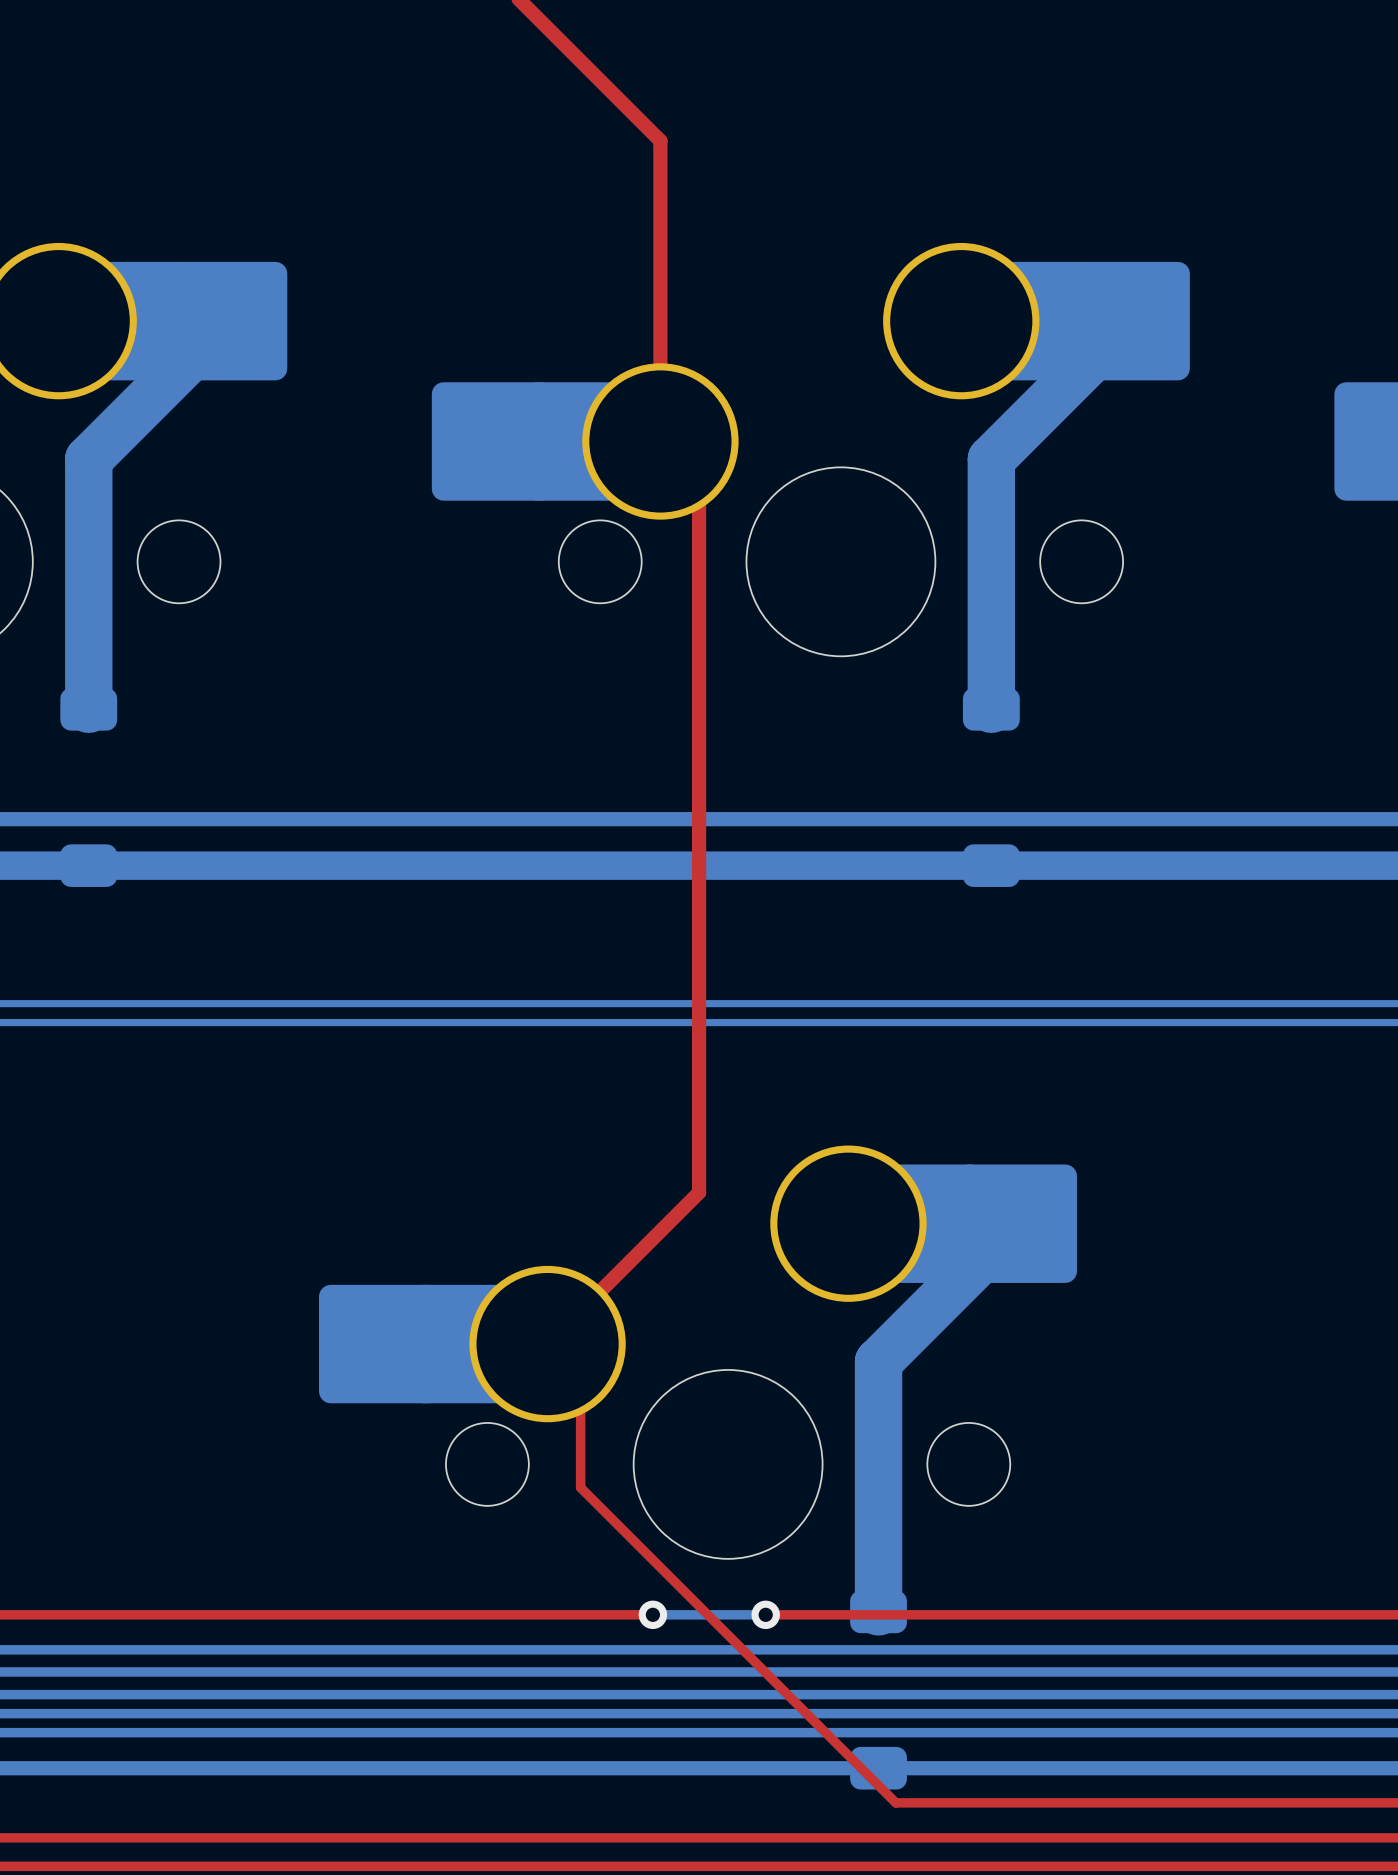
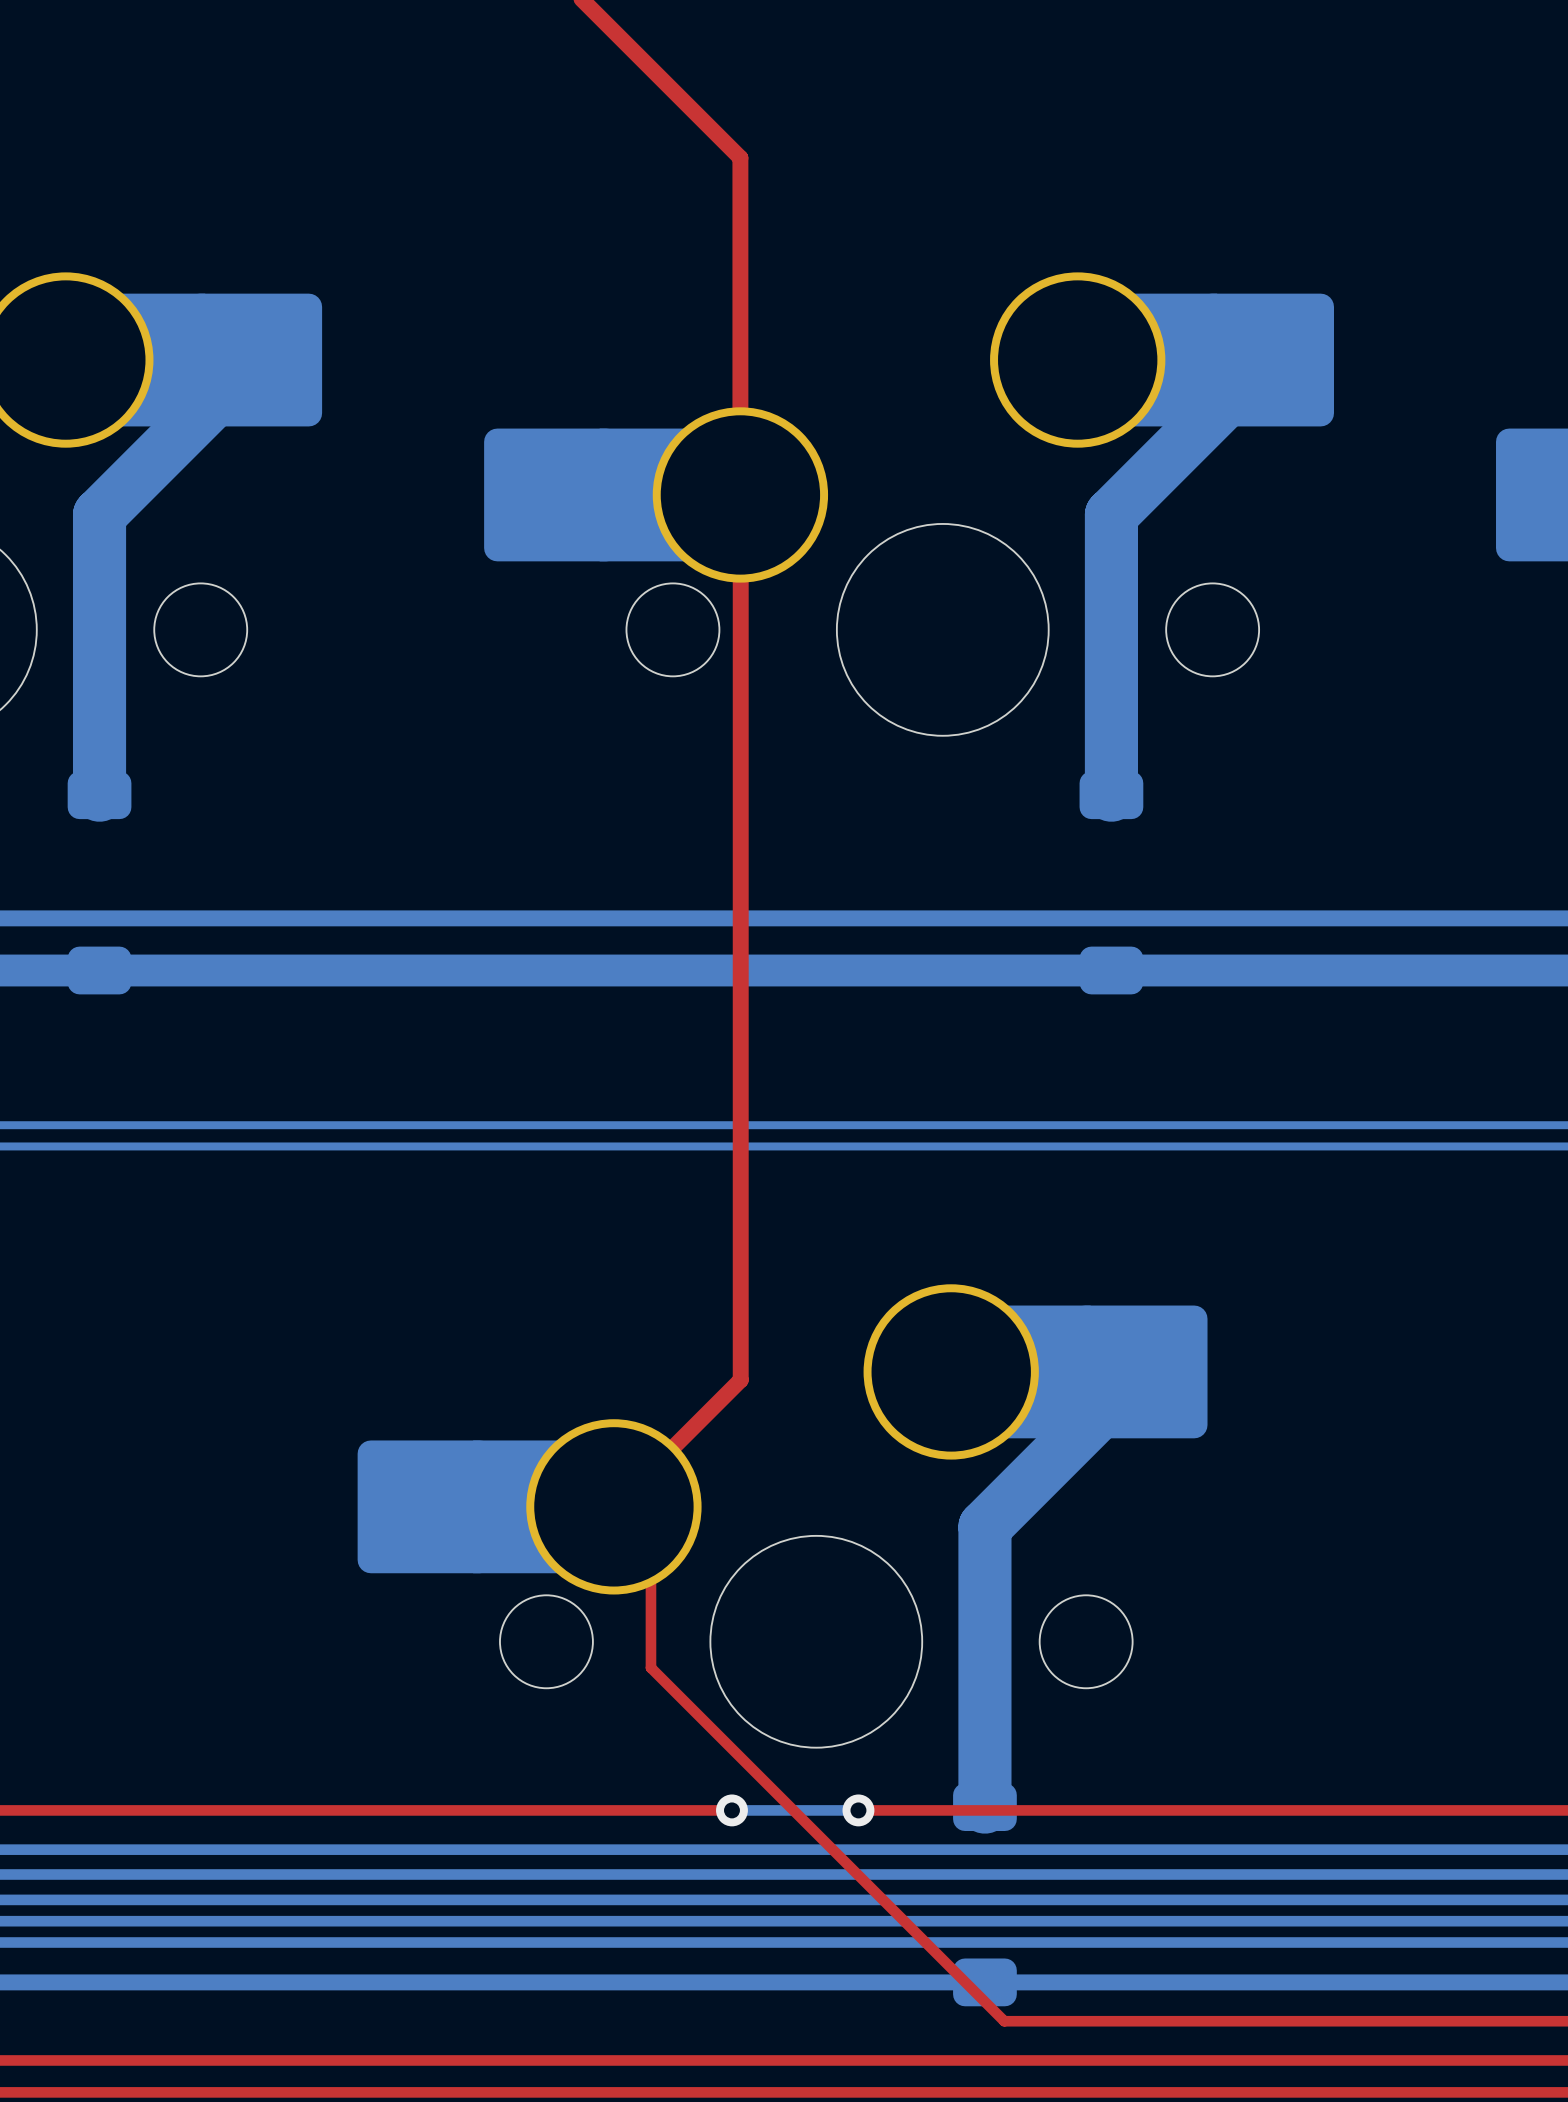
top track: (660, 441) (699, 480) (699, 1192) (660, 1230) -> (740, 495) (740, 1380)

